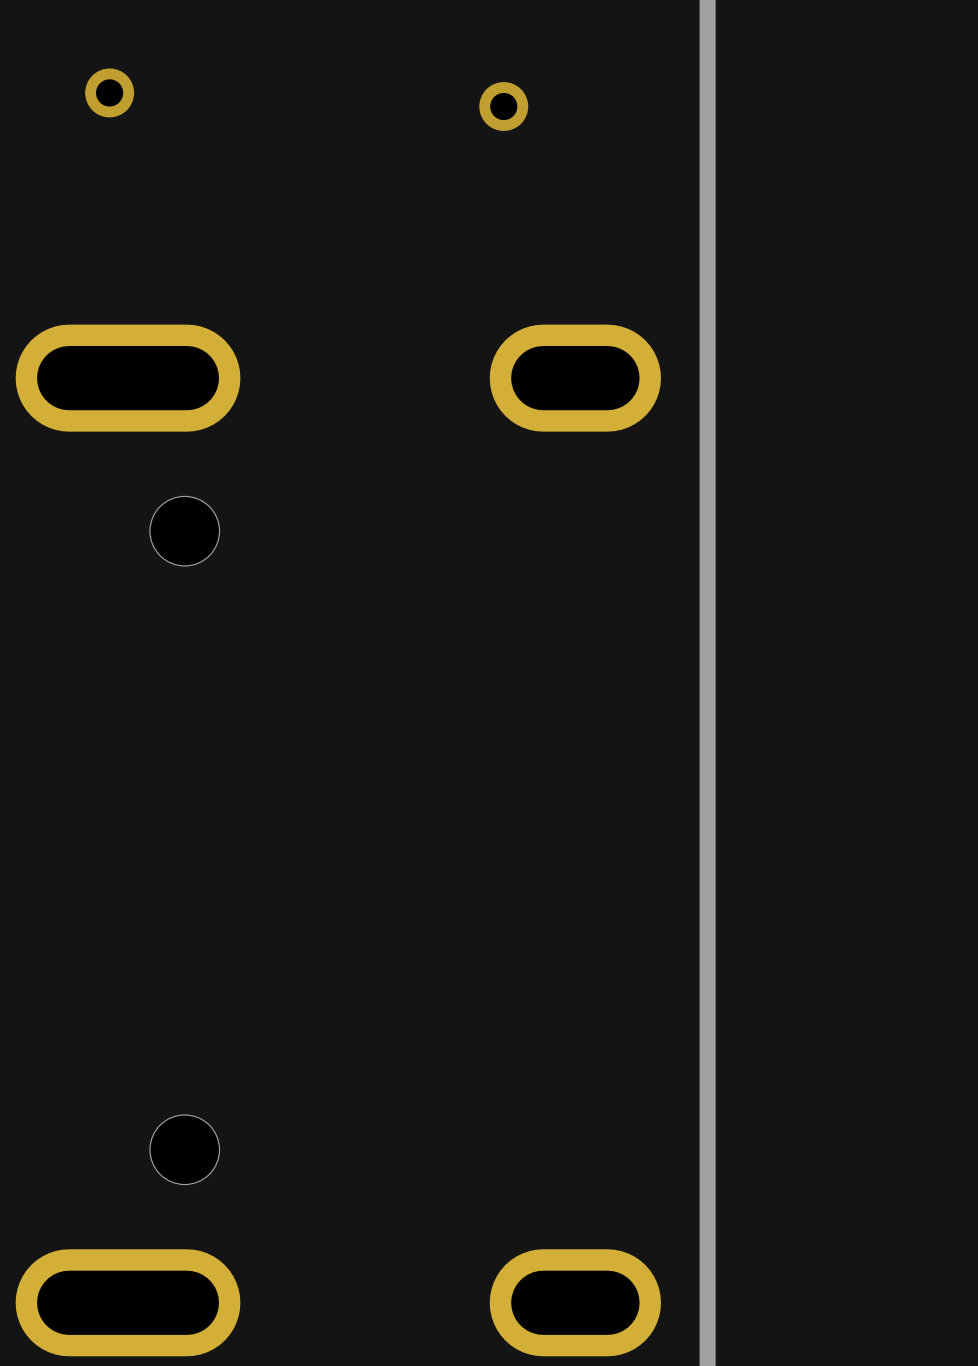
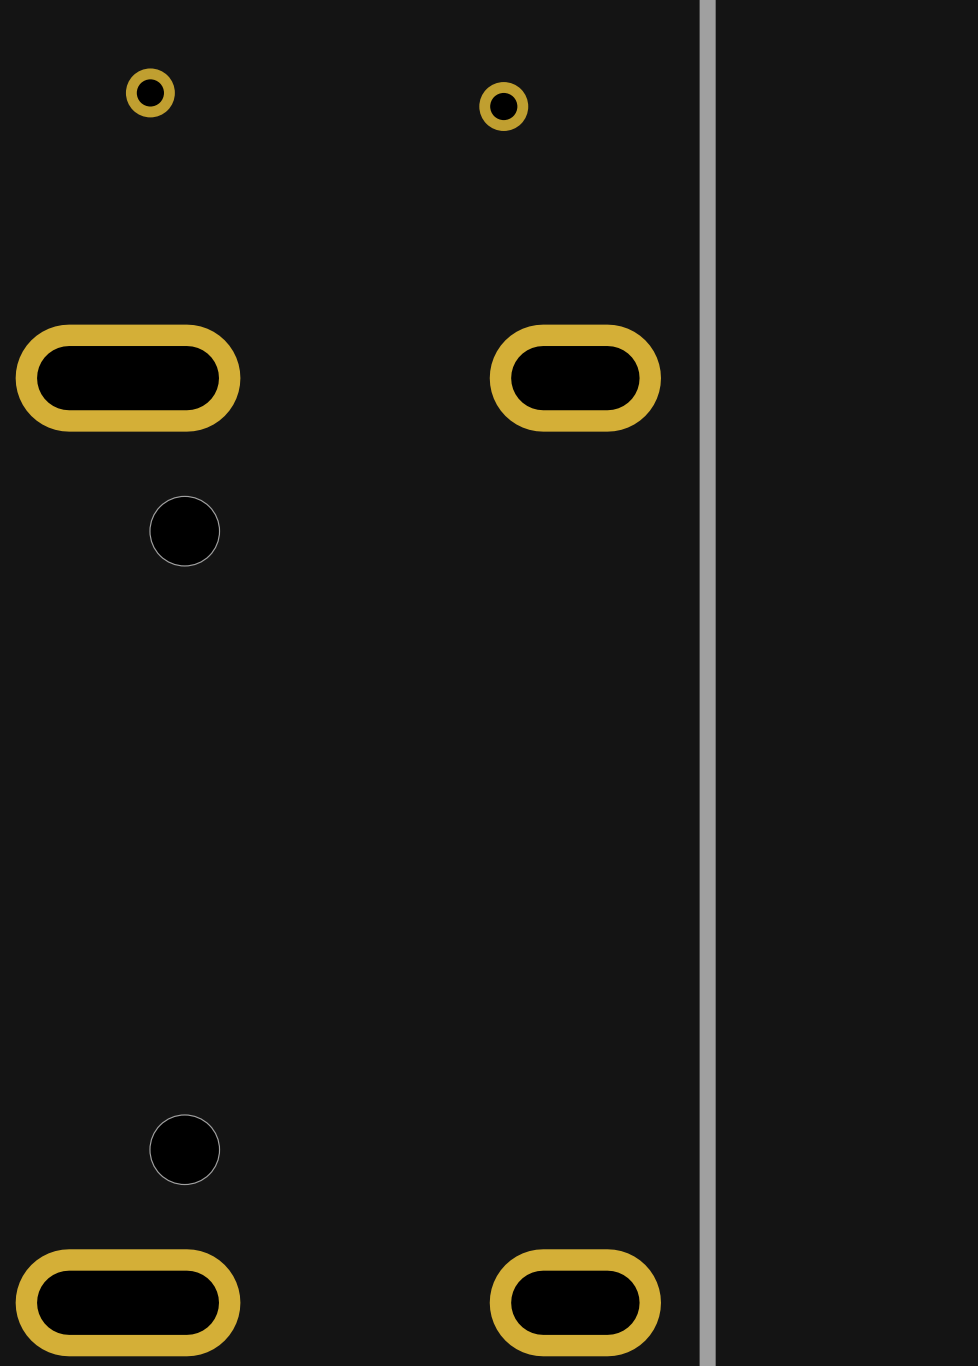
via position: (109, 92) -> (150, 92)

